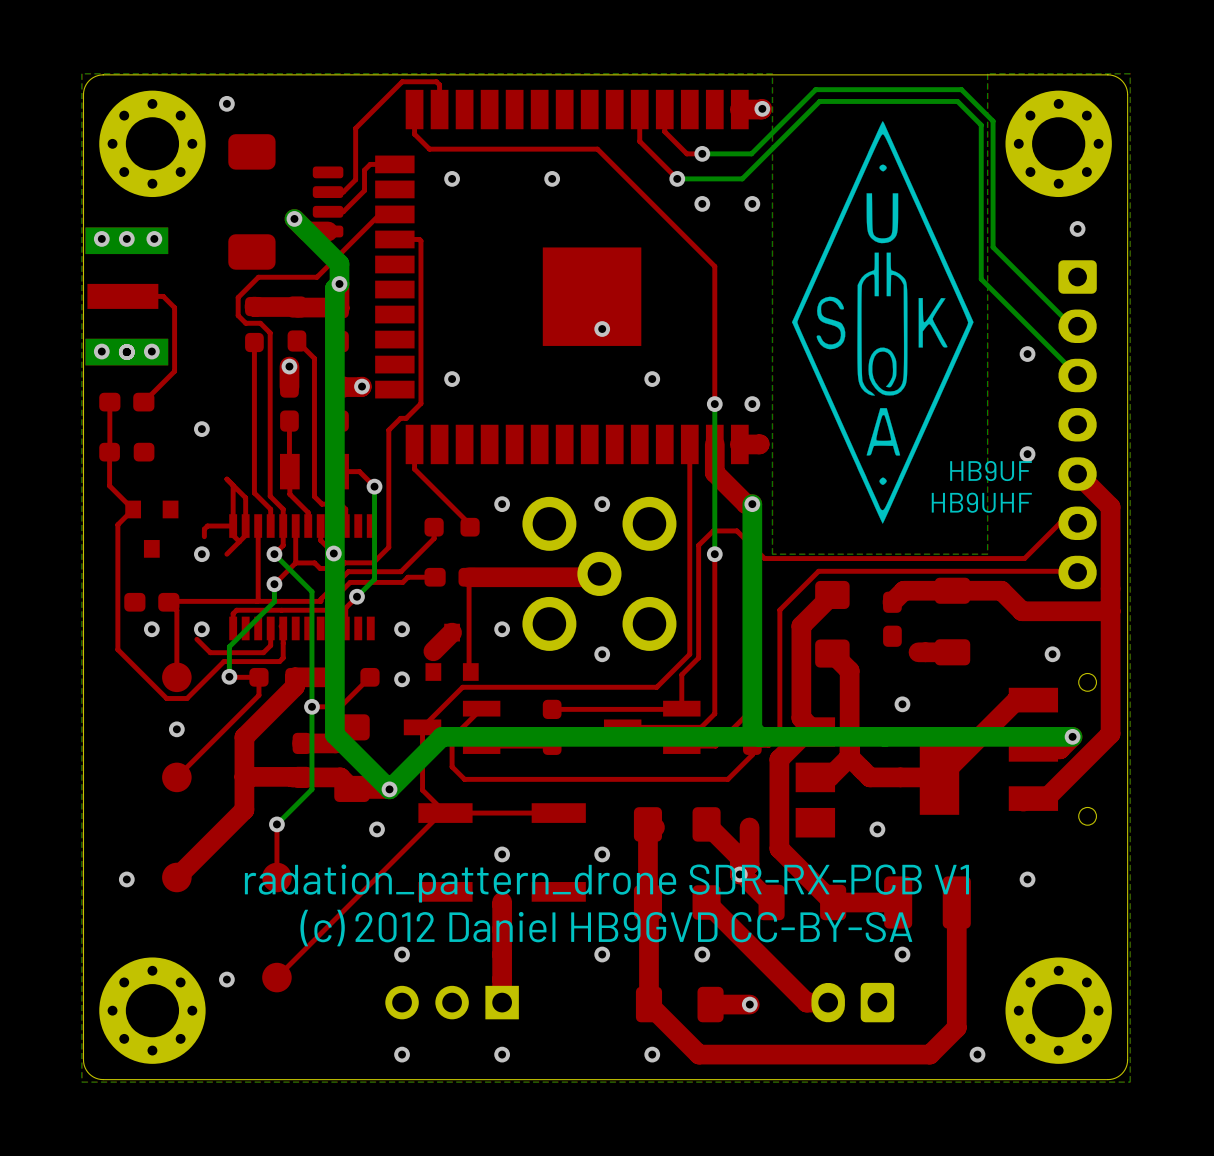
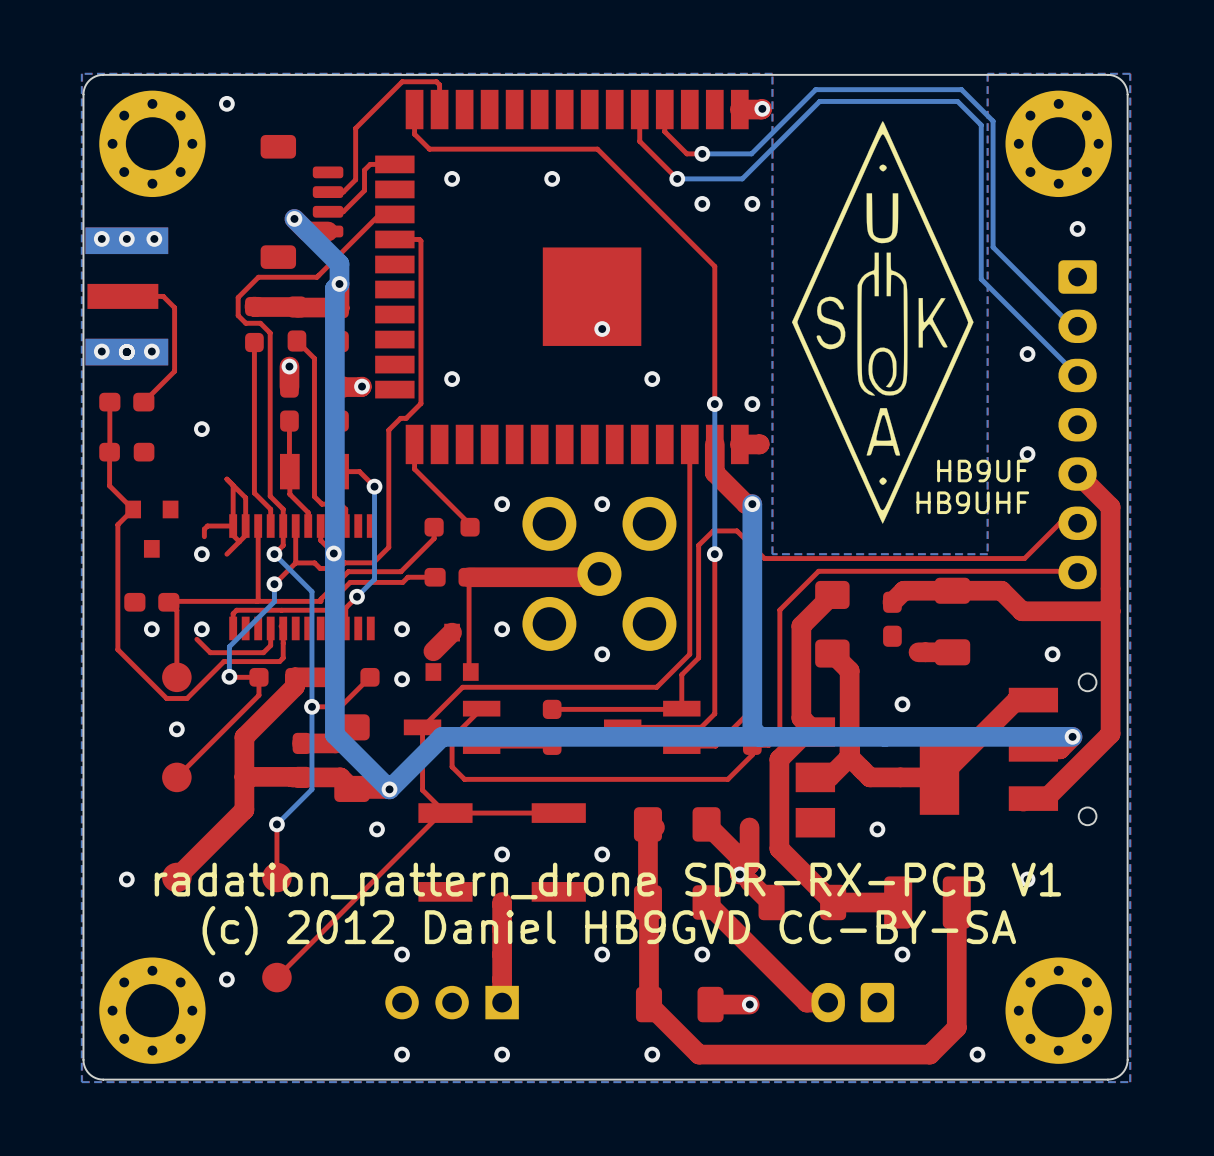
part footprint: [228, 134, 344, 270] -> [260, 134, 344, 269]

